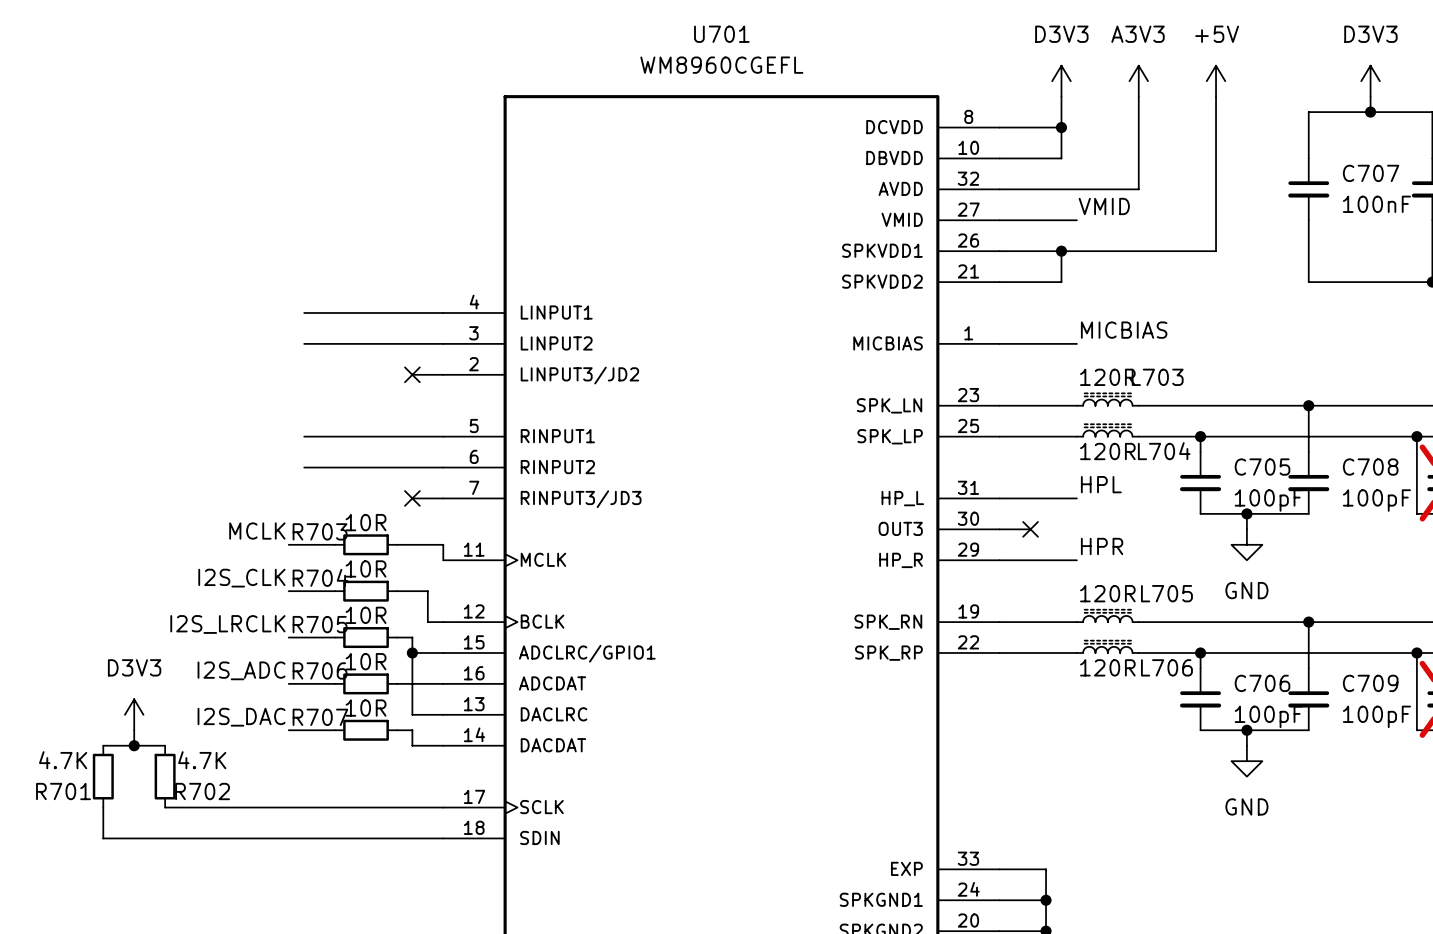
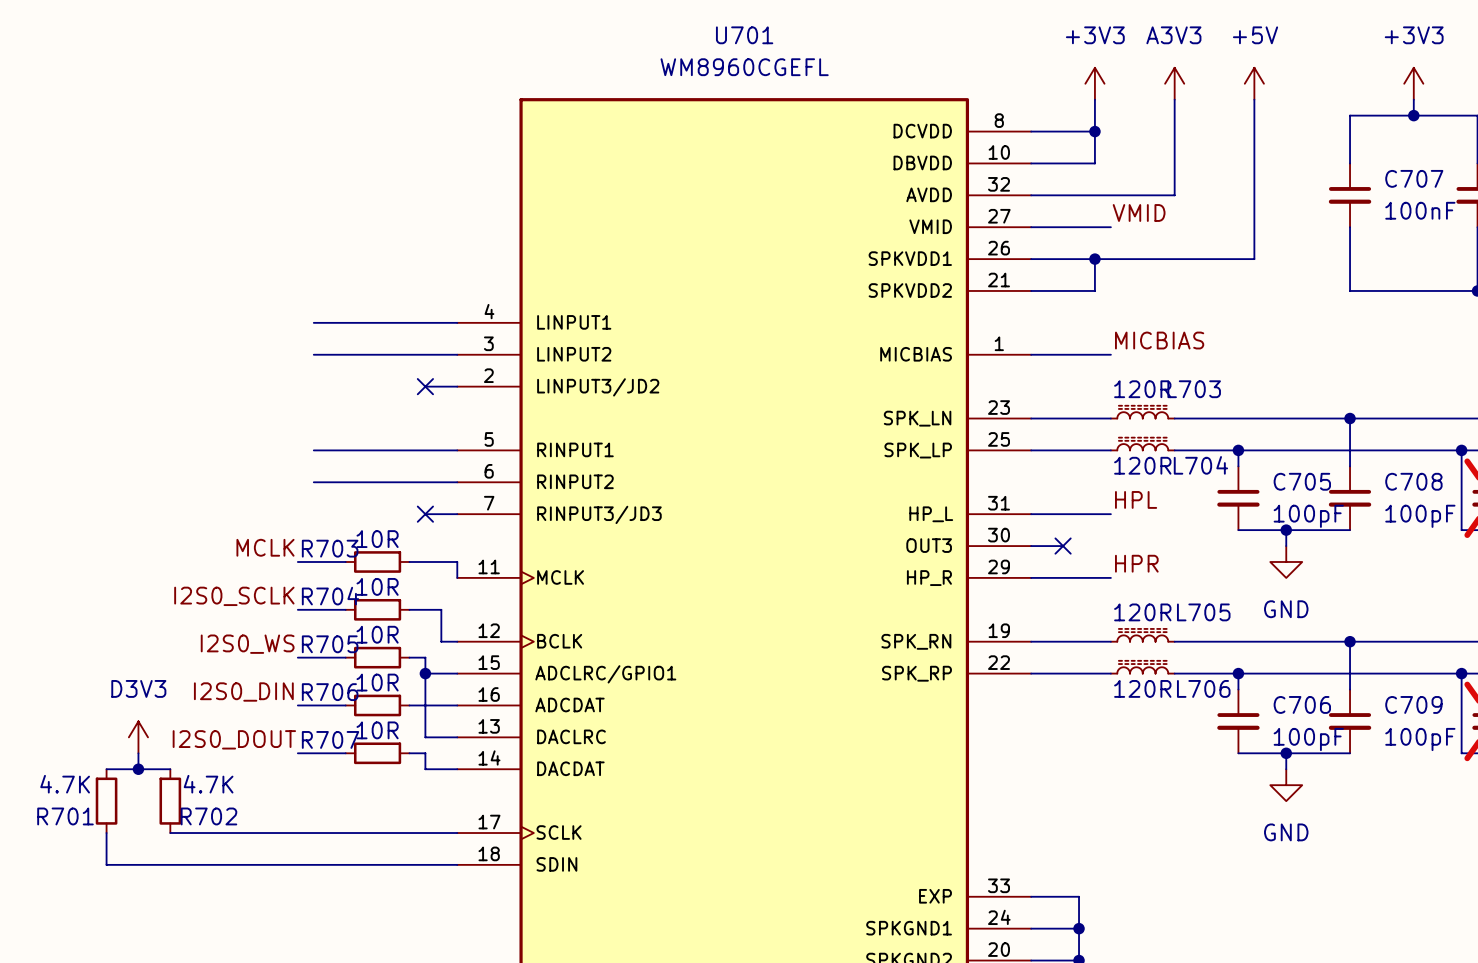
power symbol: D3V3 (1061, 81) -> +3V3 (1094, 83)
power symbol: D3V3 (1370, 81) -> +3V3 (1413, 83)
label: I2S_CLK (241, 578) -> I2S0_SCLK (234, 596)
label: I2S_LRCLK (227, 624) -> I2S0_WS (247, 644)
label: I2S_ADC (241, 670) -> I2S0_DIN (243, 692)
label: I2S_DAC (241, 717) -> I2S0_DOUT (234, 739)

